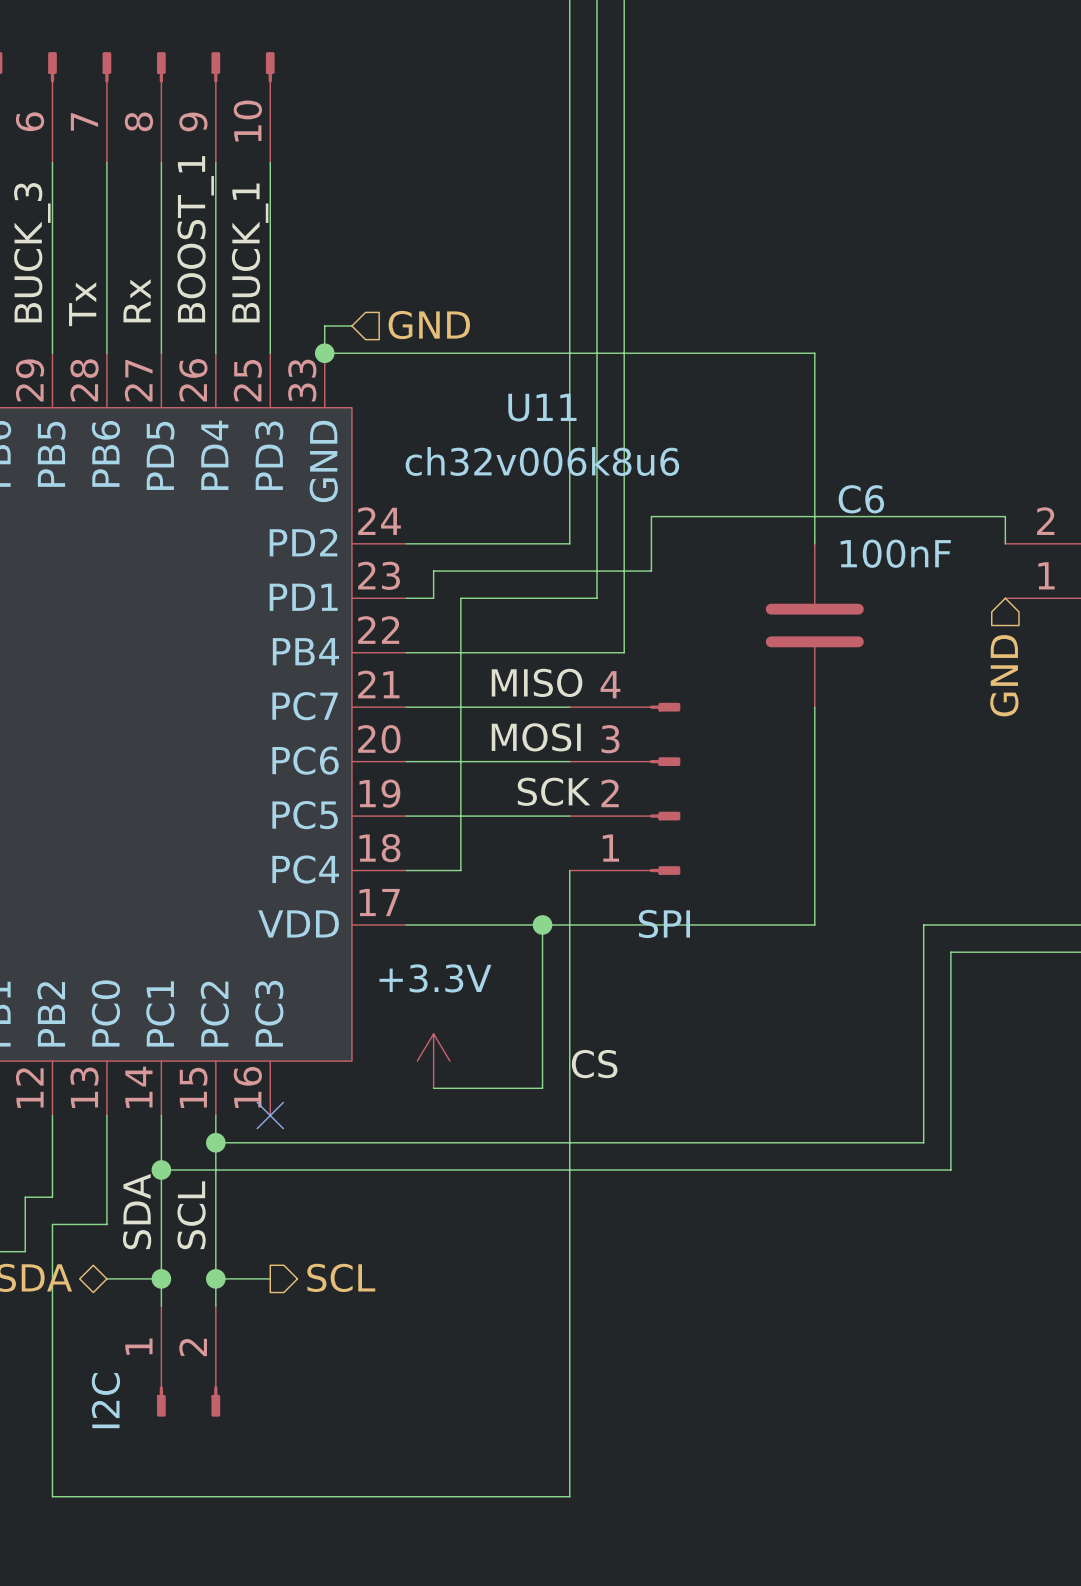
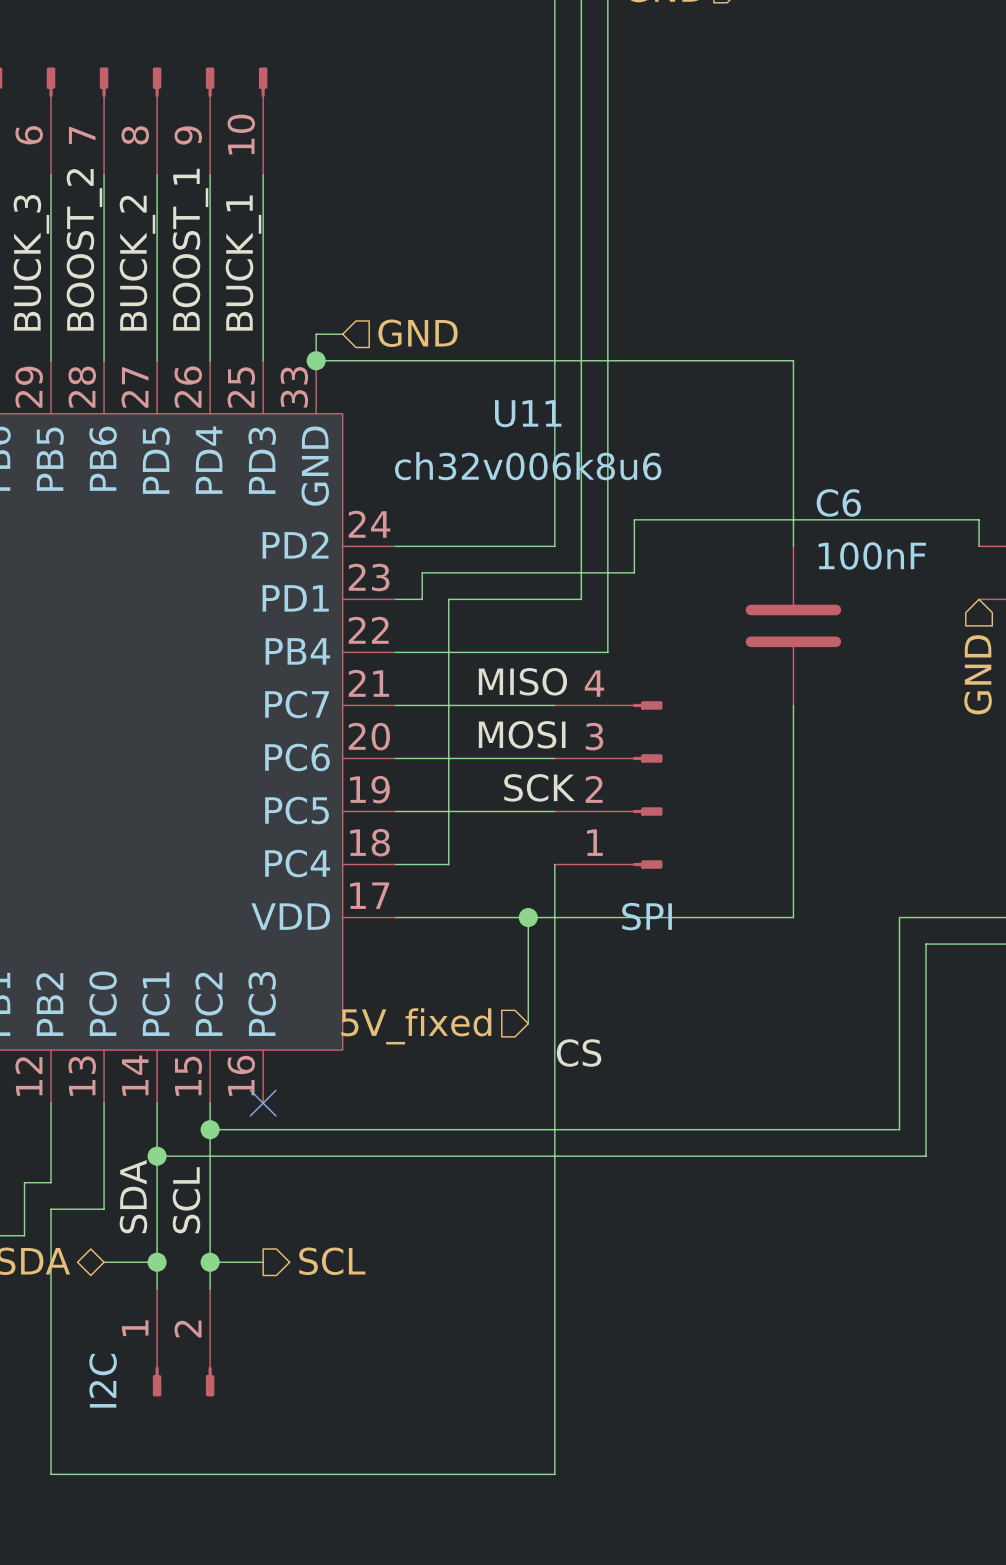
label: Rx (137, 300) -> BUCK_2 (137, 263)
label: Tx (82, 304) -> BOOST_2 (84, 249)
wire: (542, 1033) (542, 1088) (433, 1088) -> none
hierarchical label: none -> 5V_fixed (416, 1026)
power symbol: +3.3V (433, 1061) -> none

